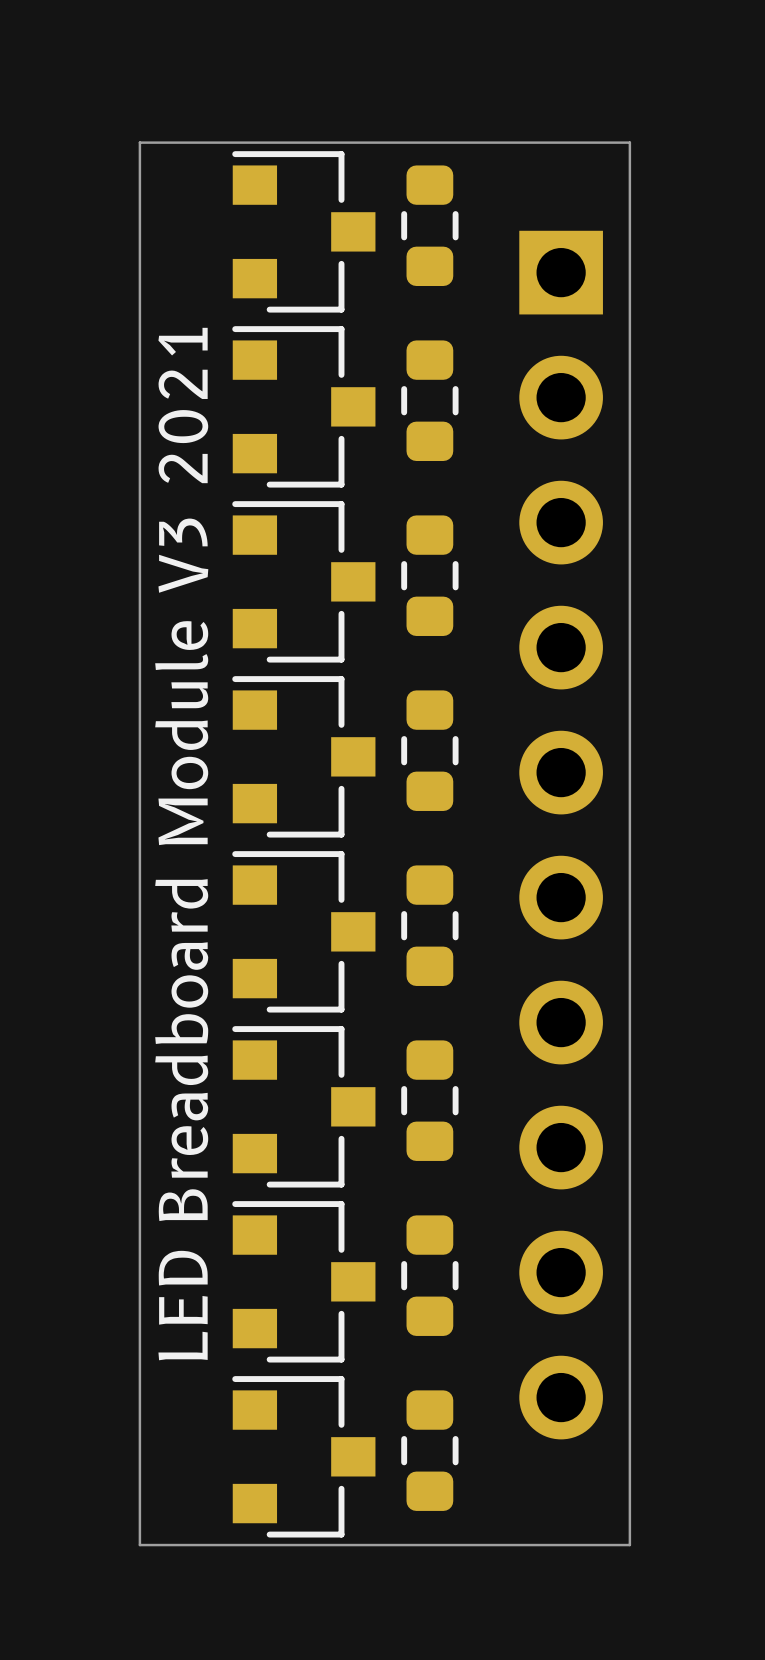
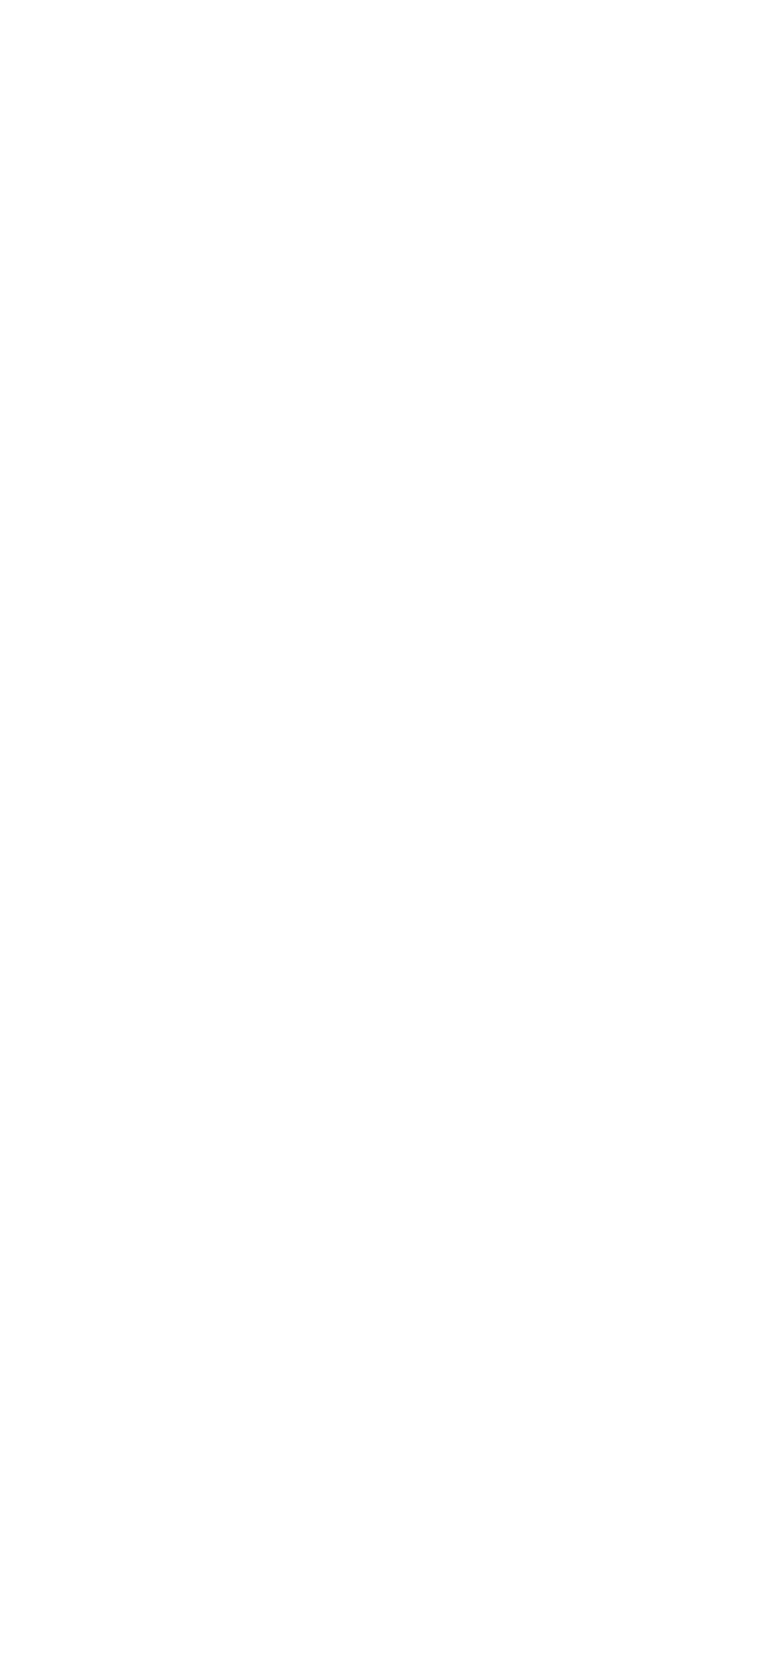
board edge: (629, 142) (629, 1545) (139, 1545) (139, 142) (629, 142) -> none
part: (429, 225) -> none
part: (303, 231) -> none
part: (429, 400) -> none
part: (303, 406) -> none
part: (429, 575) -> none
part: (303, 581) -> none
part: (429, 750) -> none
part: (303, 756) -> none
part: (561, 835) -> none
text: LED Breadboard Module V3 2021 (181, 844) -> none
part: (429, 925) -> none
part: (303, 931) -> none
part: (429, 1100) -> none
part: (303, 1106) -> none
part: (429, 1275) -> none
part: (303, 1281) -> none
part: (429, 1450) -> none
part: (303, 1456) -> none

